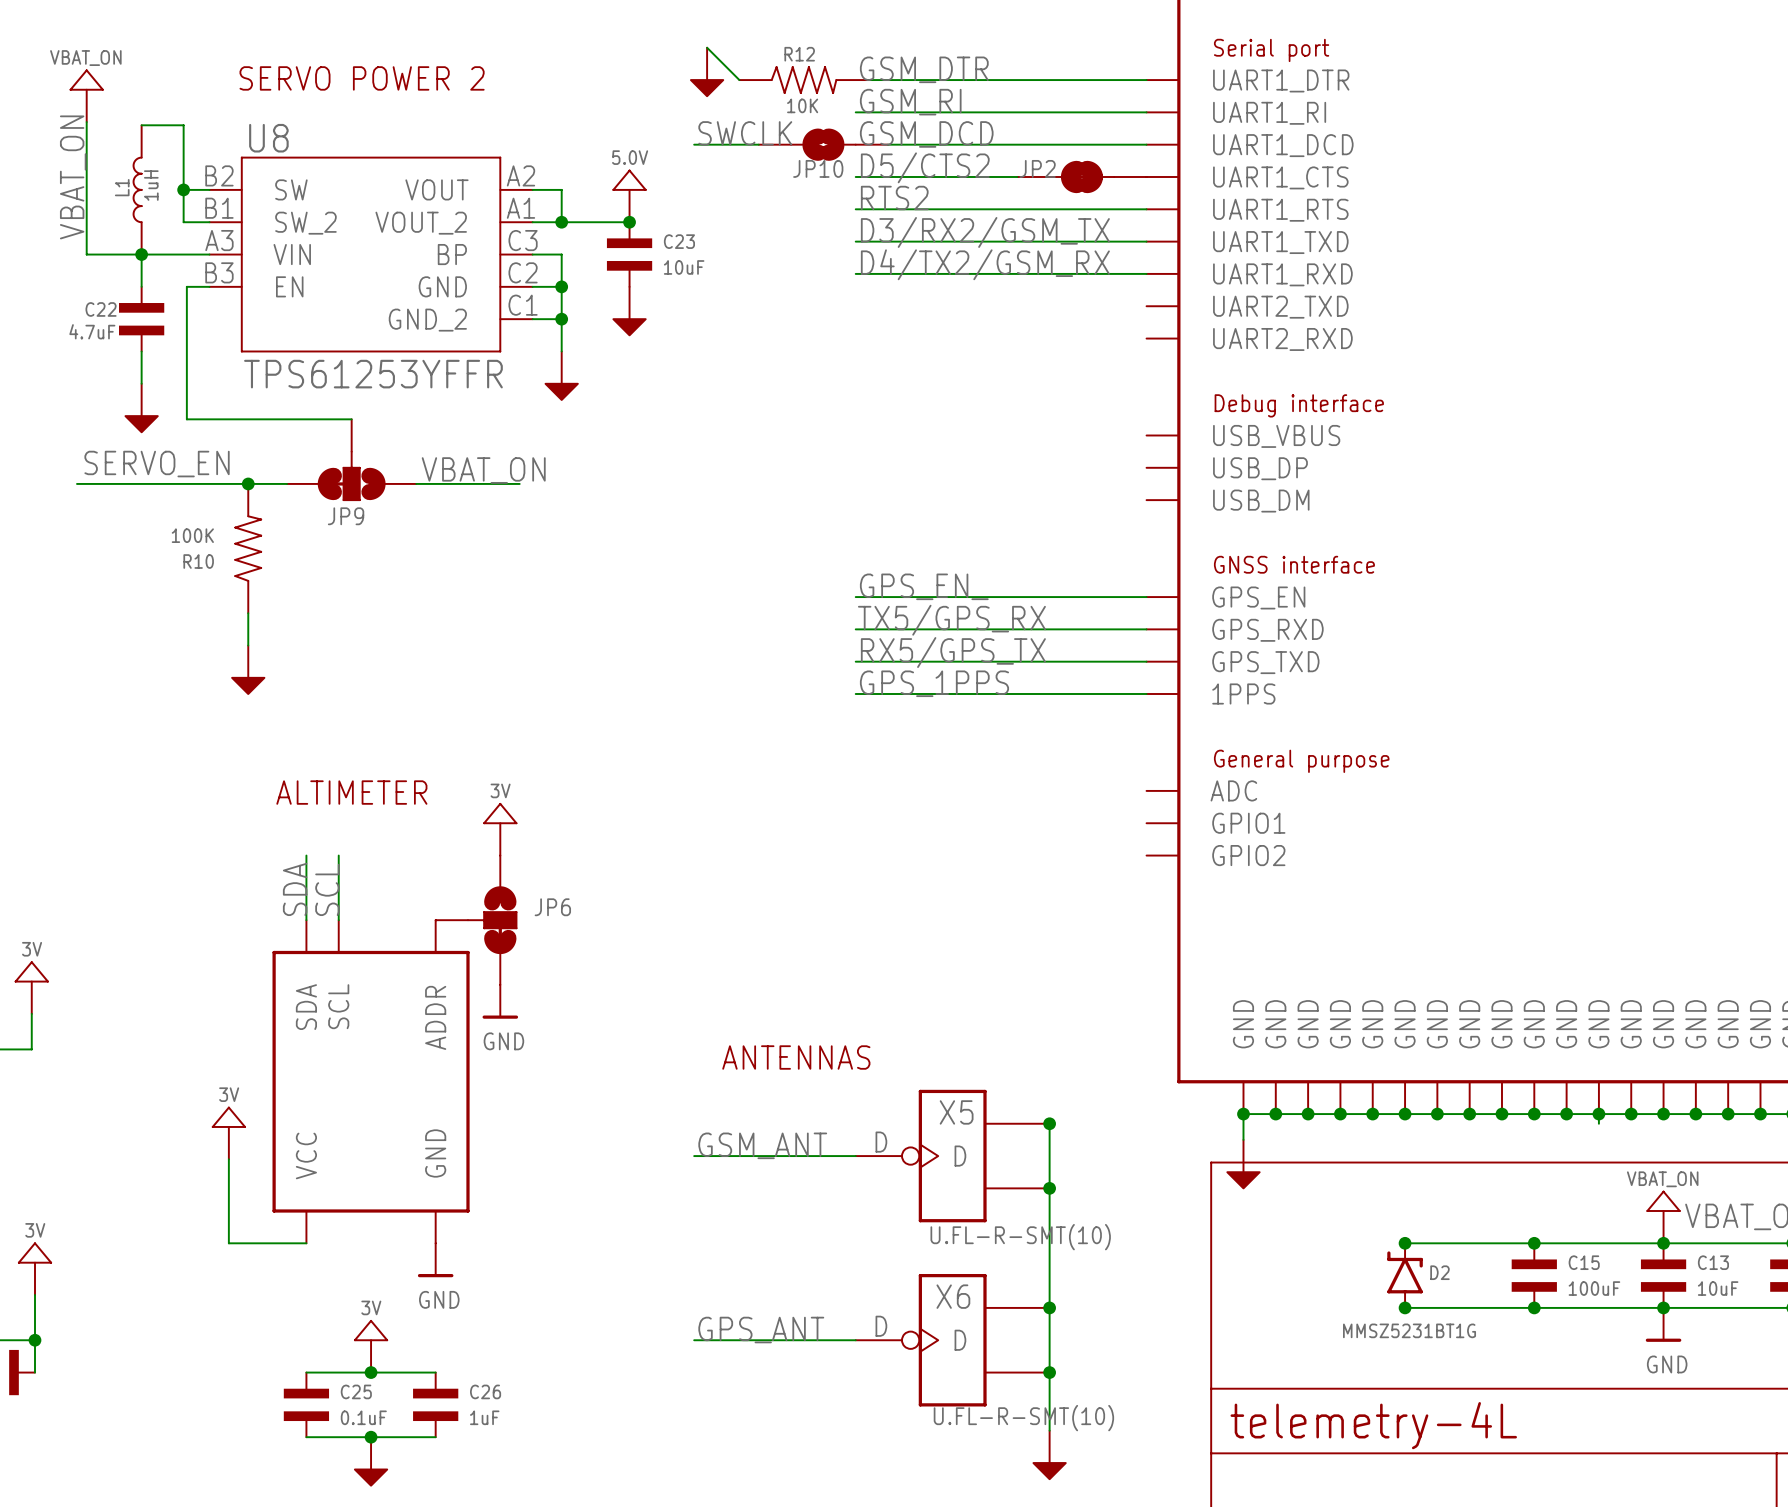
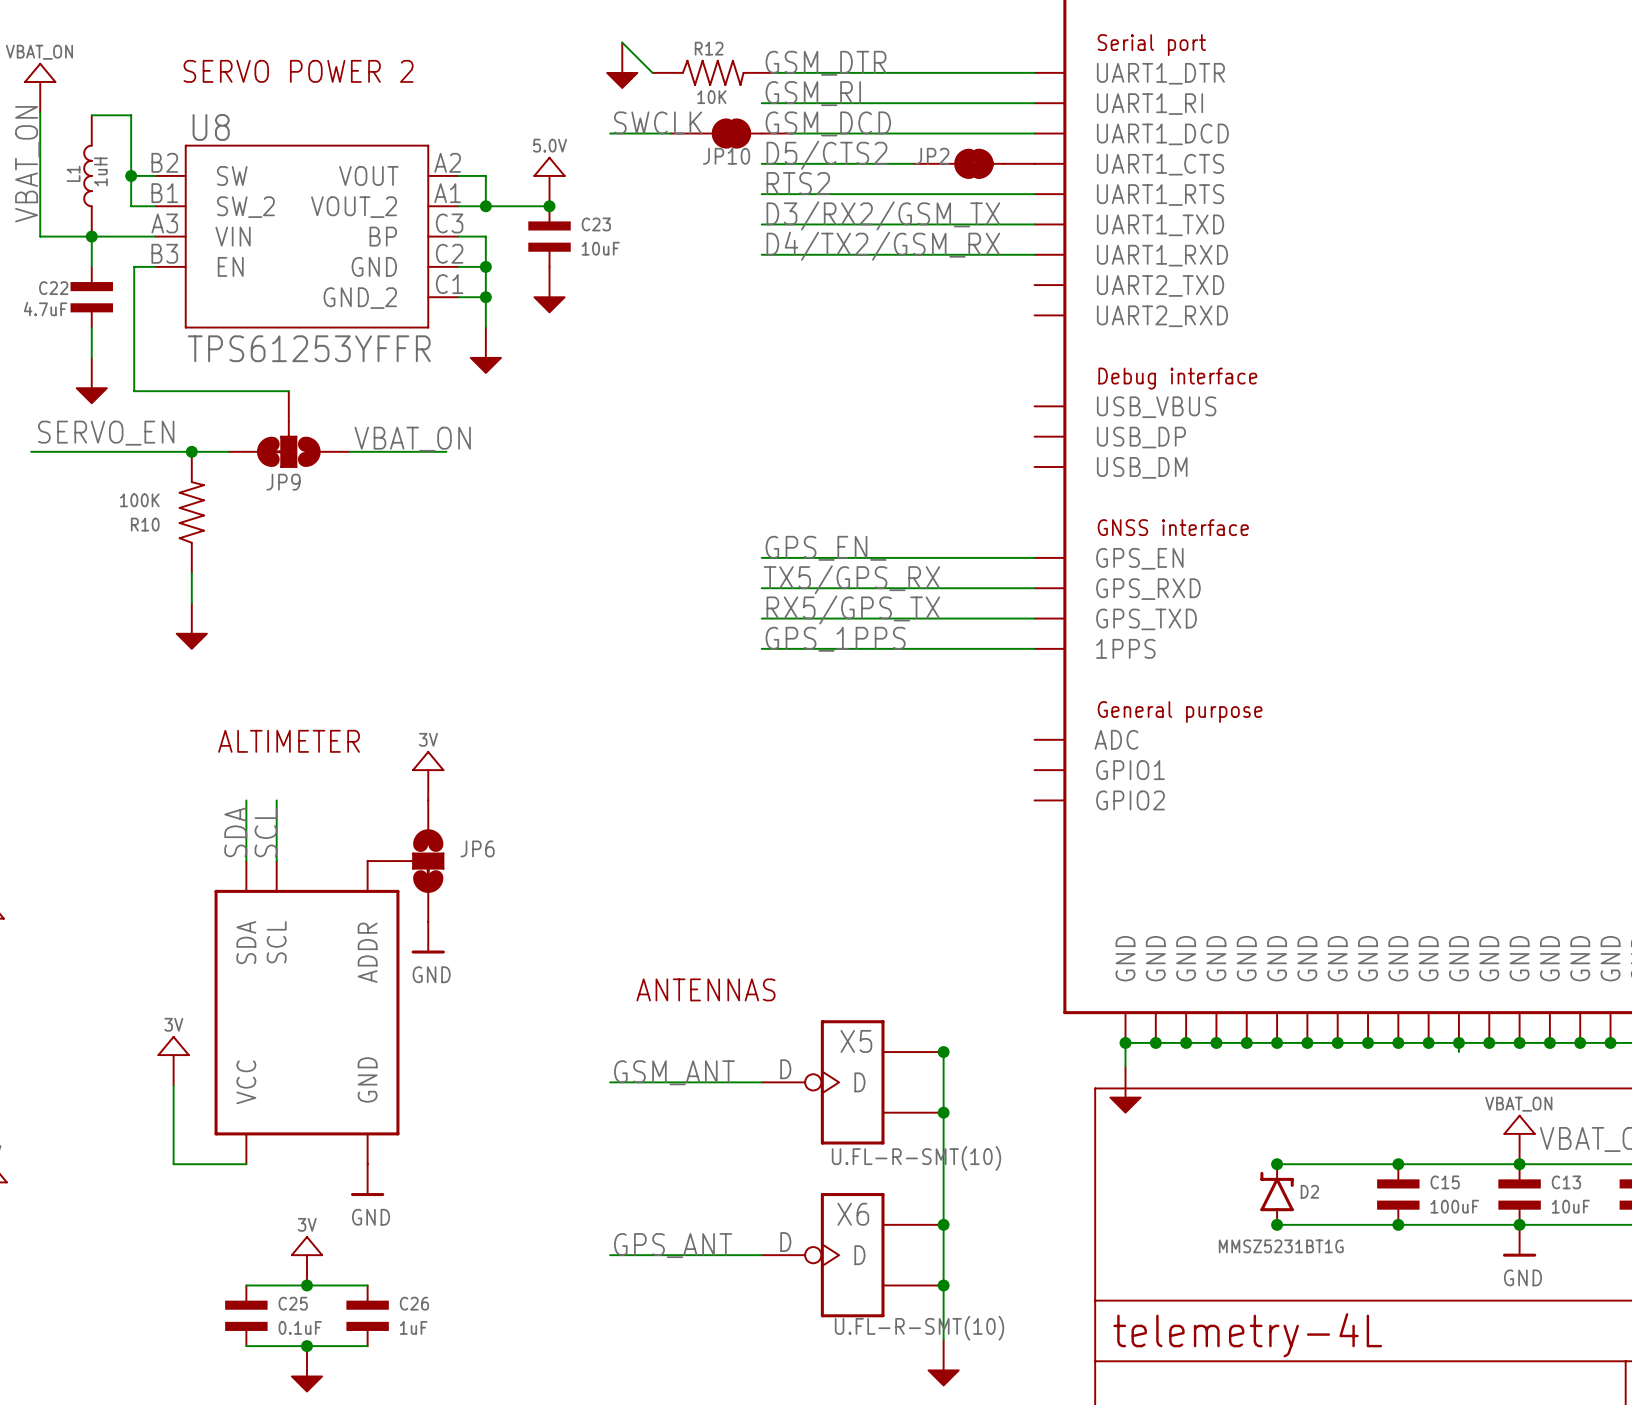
JP10 symbol: [758, 128, 889, 161] -> [670, 118, 793, 149]

